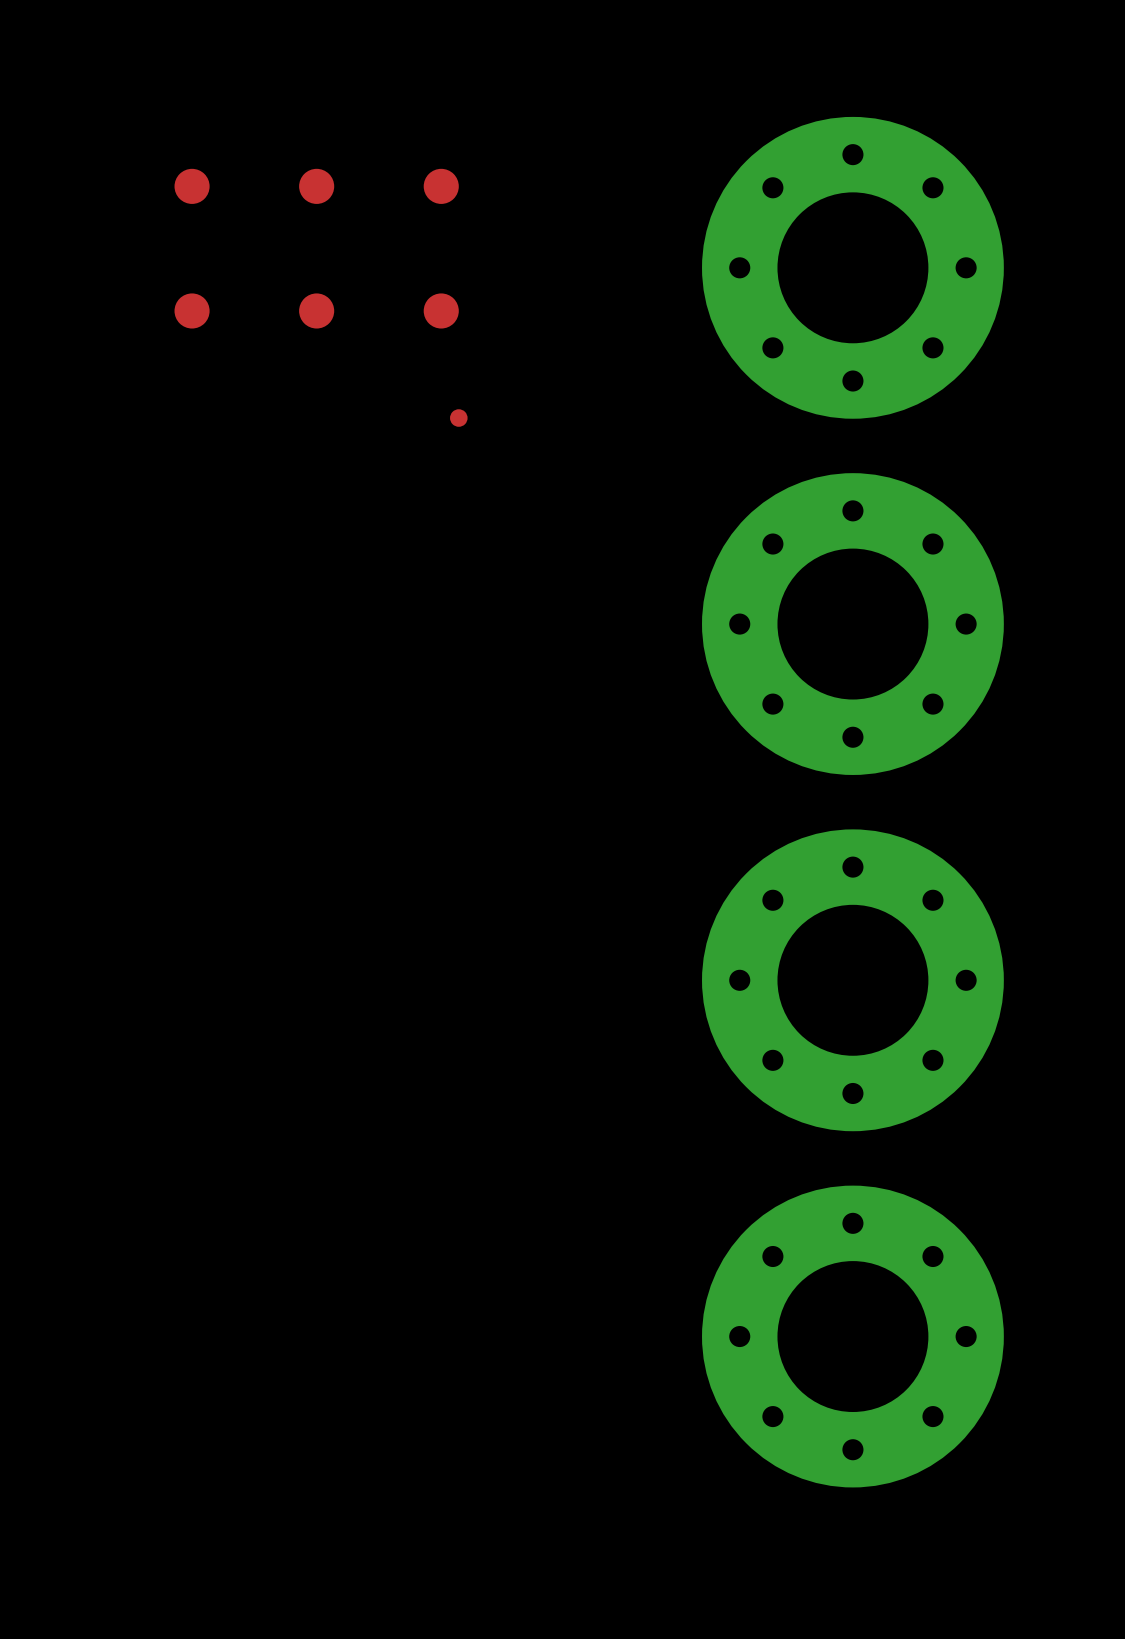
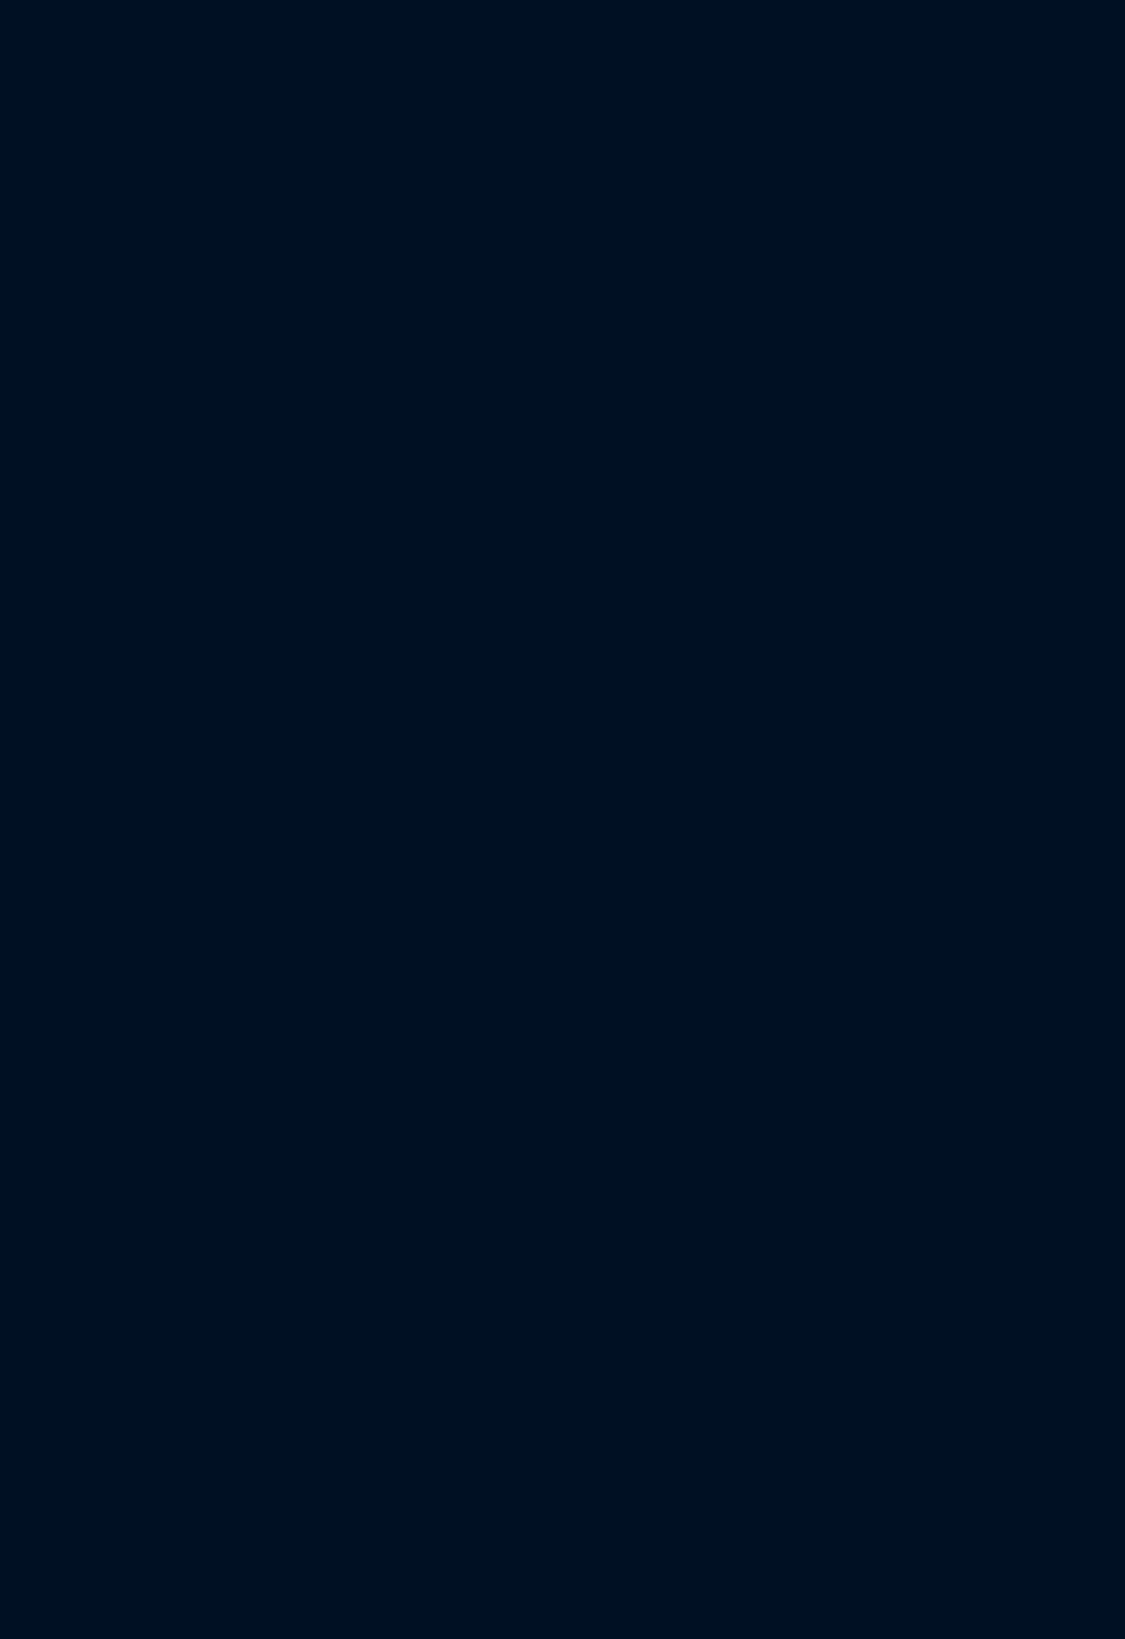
part: (192, 186) -> none
part: (316, 186) -> none
part: (441, 186) -> none
part: (852, 267) -> none
part: (192, 310) -> none
part: (316, 310) -> none
part: (441, 310) -> none
part: (458, 418) -> none
part: (852, 624) -> none
part: (852, 980) -> none
part: (852, 1336) -> none

